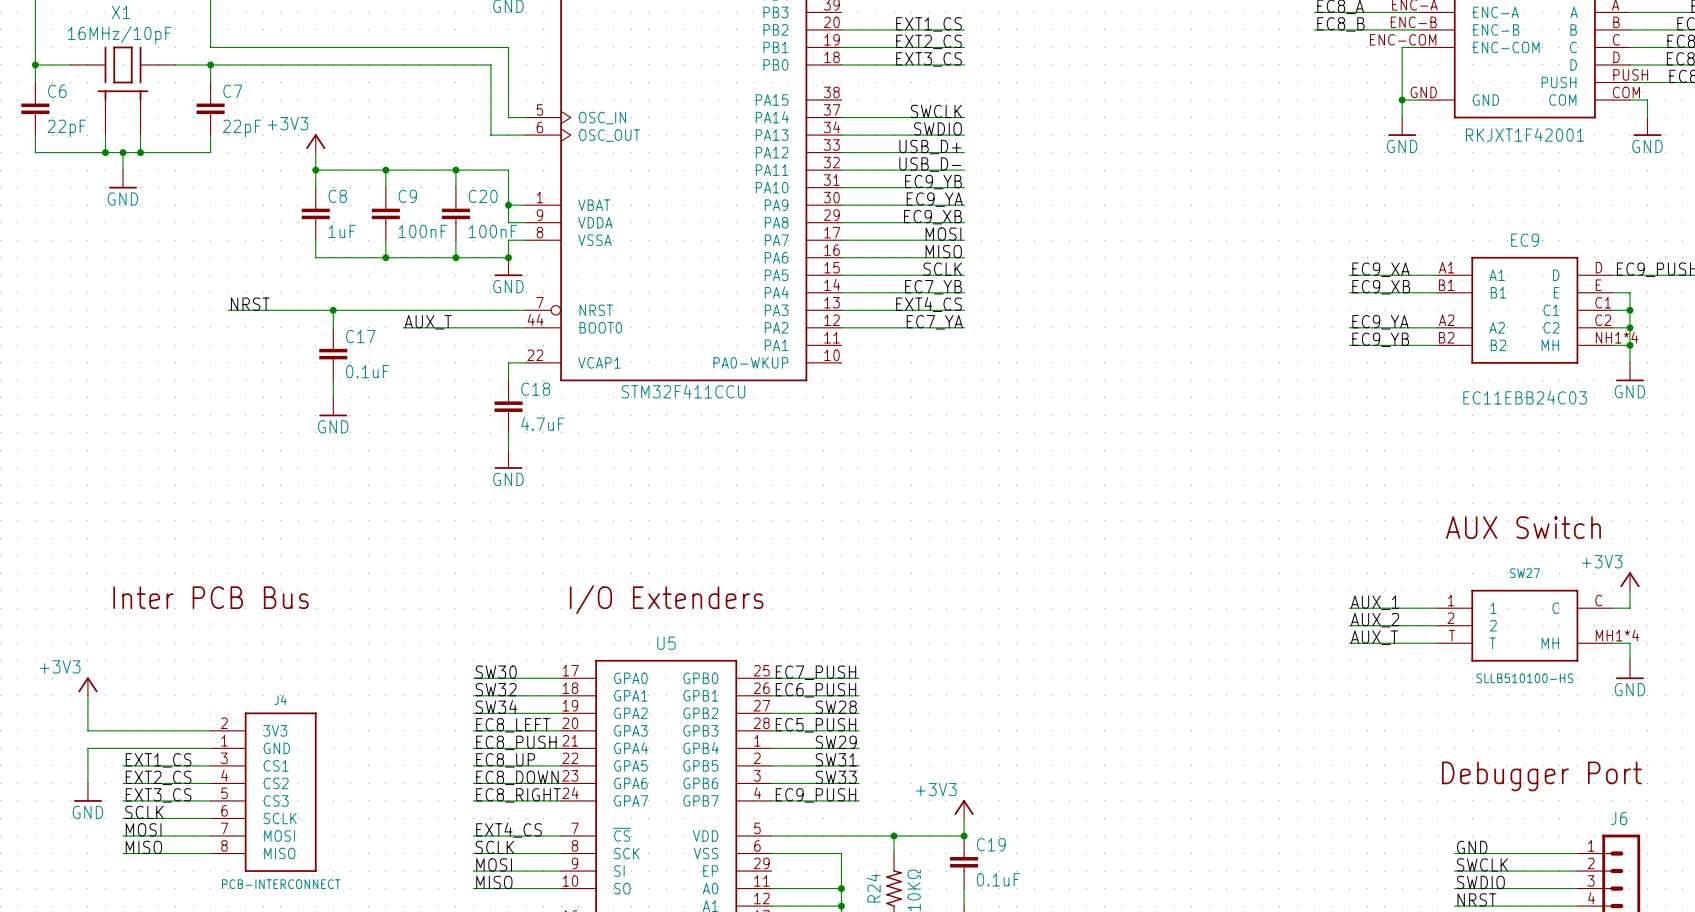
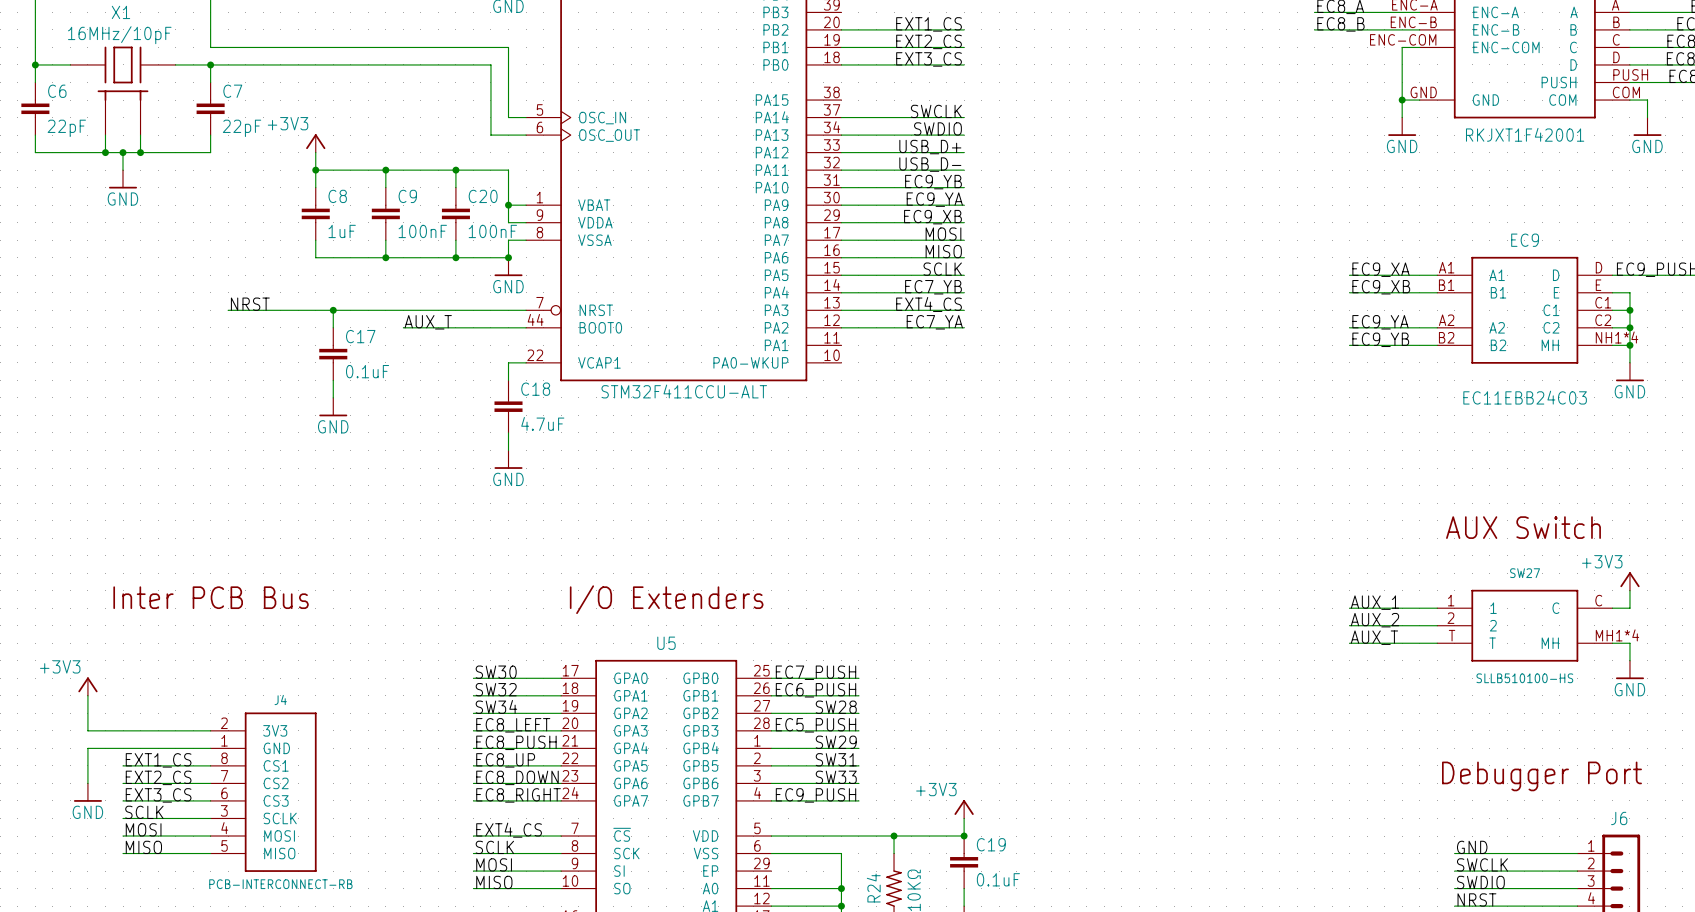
part value: STM32F411CCU (683, 391) -> STM32F411CCU-ALT (684, 391)
J4 pin number: 3 (224, 758) -> 8 (224, 758)
J4 pin number: 4 (224, 775) -> 7 (224, 775)
J4 pin number: 5 (224, 793) -> 6 (224, 793)
J4 pin number: 6 (224, 810) -> 3 (224, 810)
J4 pin number: 7 (224, 828) -> 4 (224, 828)
J4 pin number: 8 (224, 845) -> 5 (224, 845)
J4 value: PCB-INTERCONNECT (281, 884) -> PCB-INTERCONNECT-RB (280, 884)

